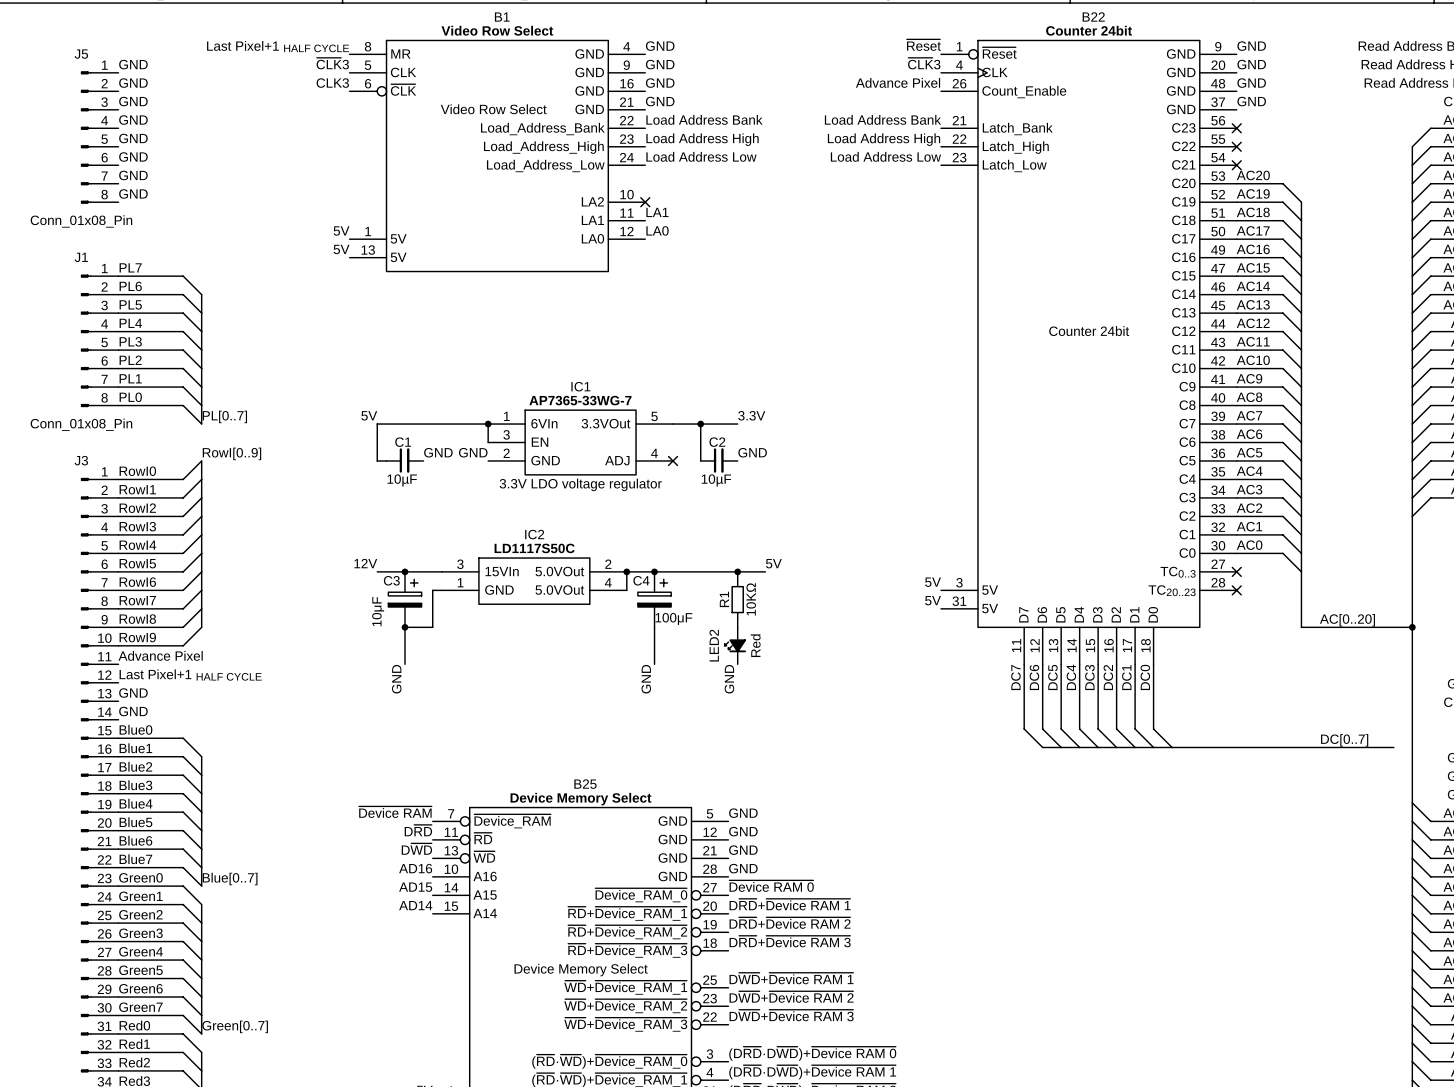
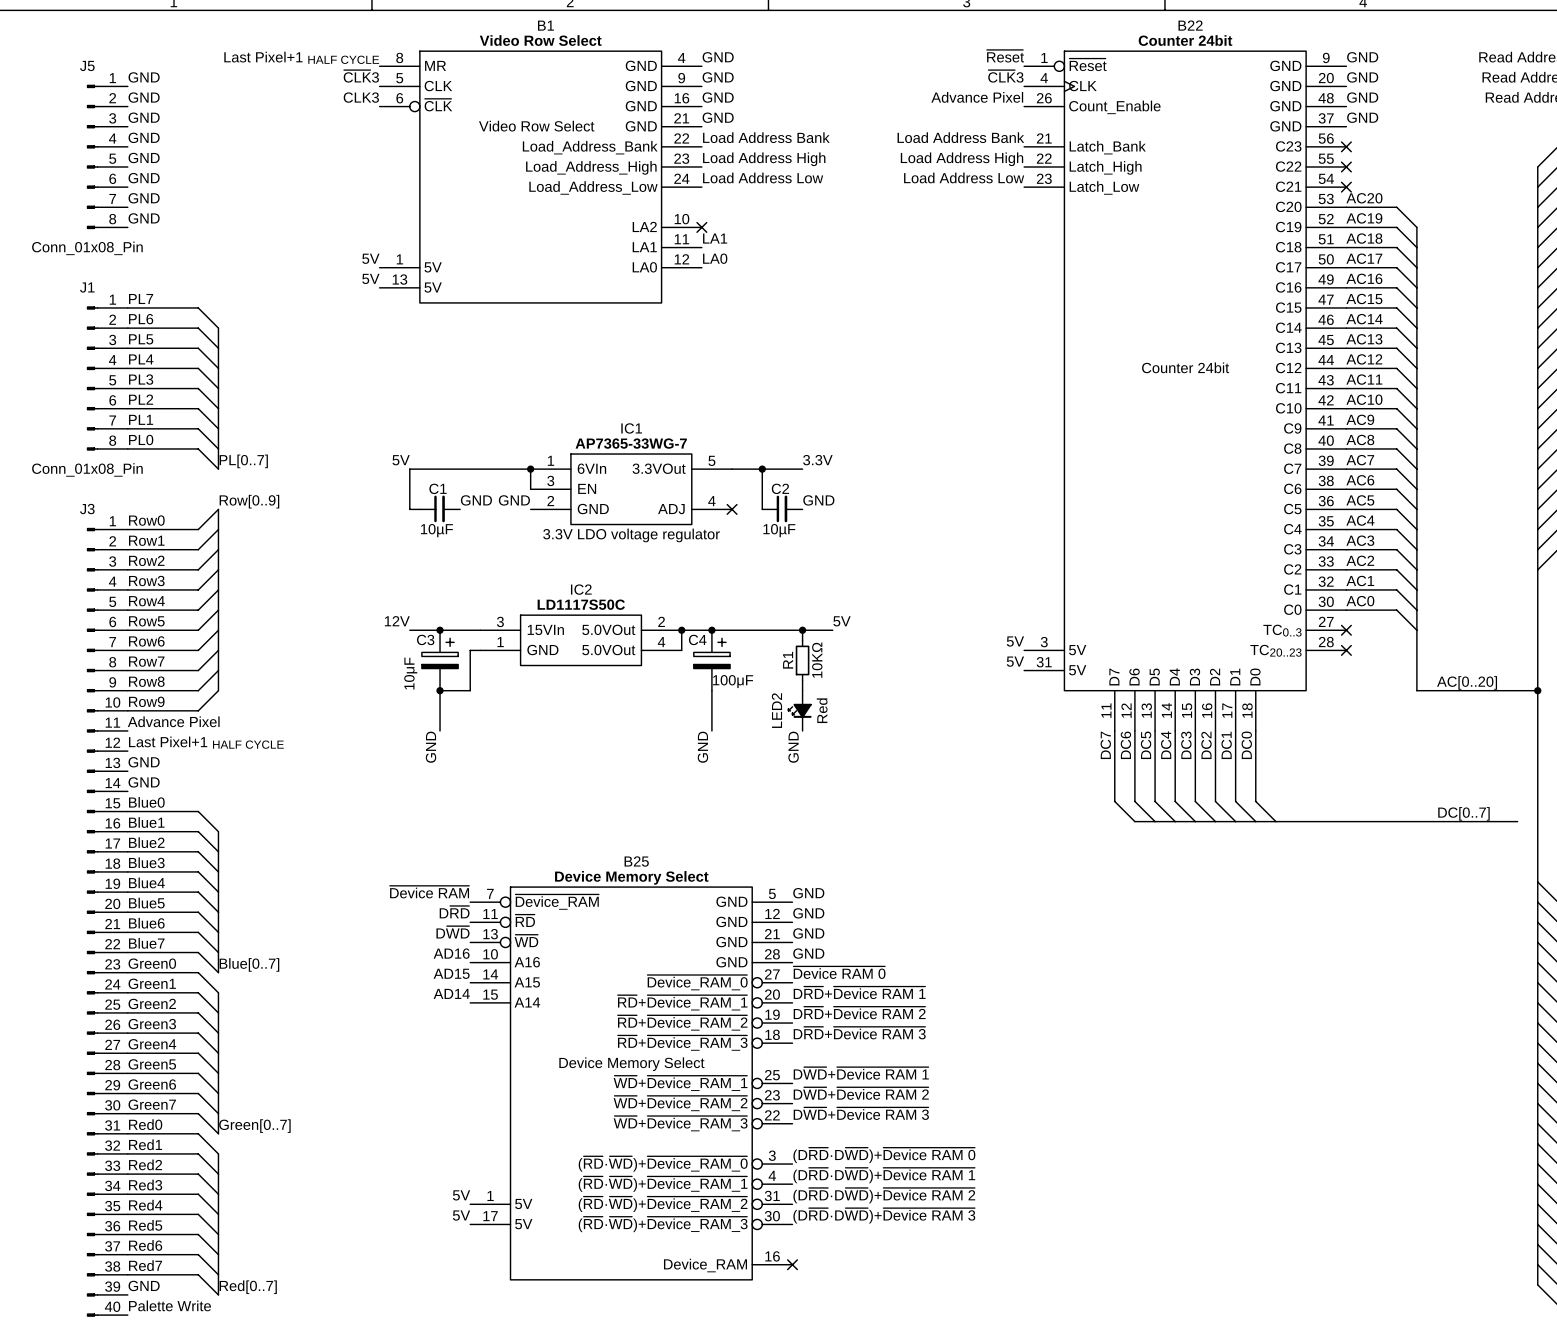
label: RowI[0..9] (231, 453) -> Row[0..9] (249, 501)
label: RowI0 (137, 471) -> Row0 (146, 520)
label: RowI1 (137, 489) -> Row1 (146, 540)
label: RowI2 (137, 508) -> Row2 (146, 560)
label: RowI3 (137, 526) -> Row3 (146, 580)
label: RowI4 (137, 545) -> Row4 (146, 601)
label: RowI5 (137, 563) -> Row5 (146, 621)
label: RowI6 (137, 582) -> Row6 (146, 641)
label: RowI7 (137, 600) -> Row7 (146, 661)
label: RowI8 (137, 619) -> Row8 (146, 681)
label: RowI9 (137, 637) -> Row9 (146, 701)

